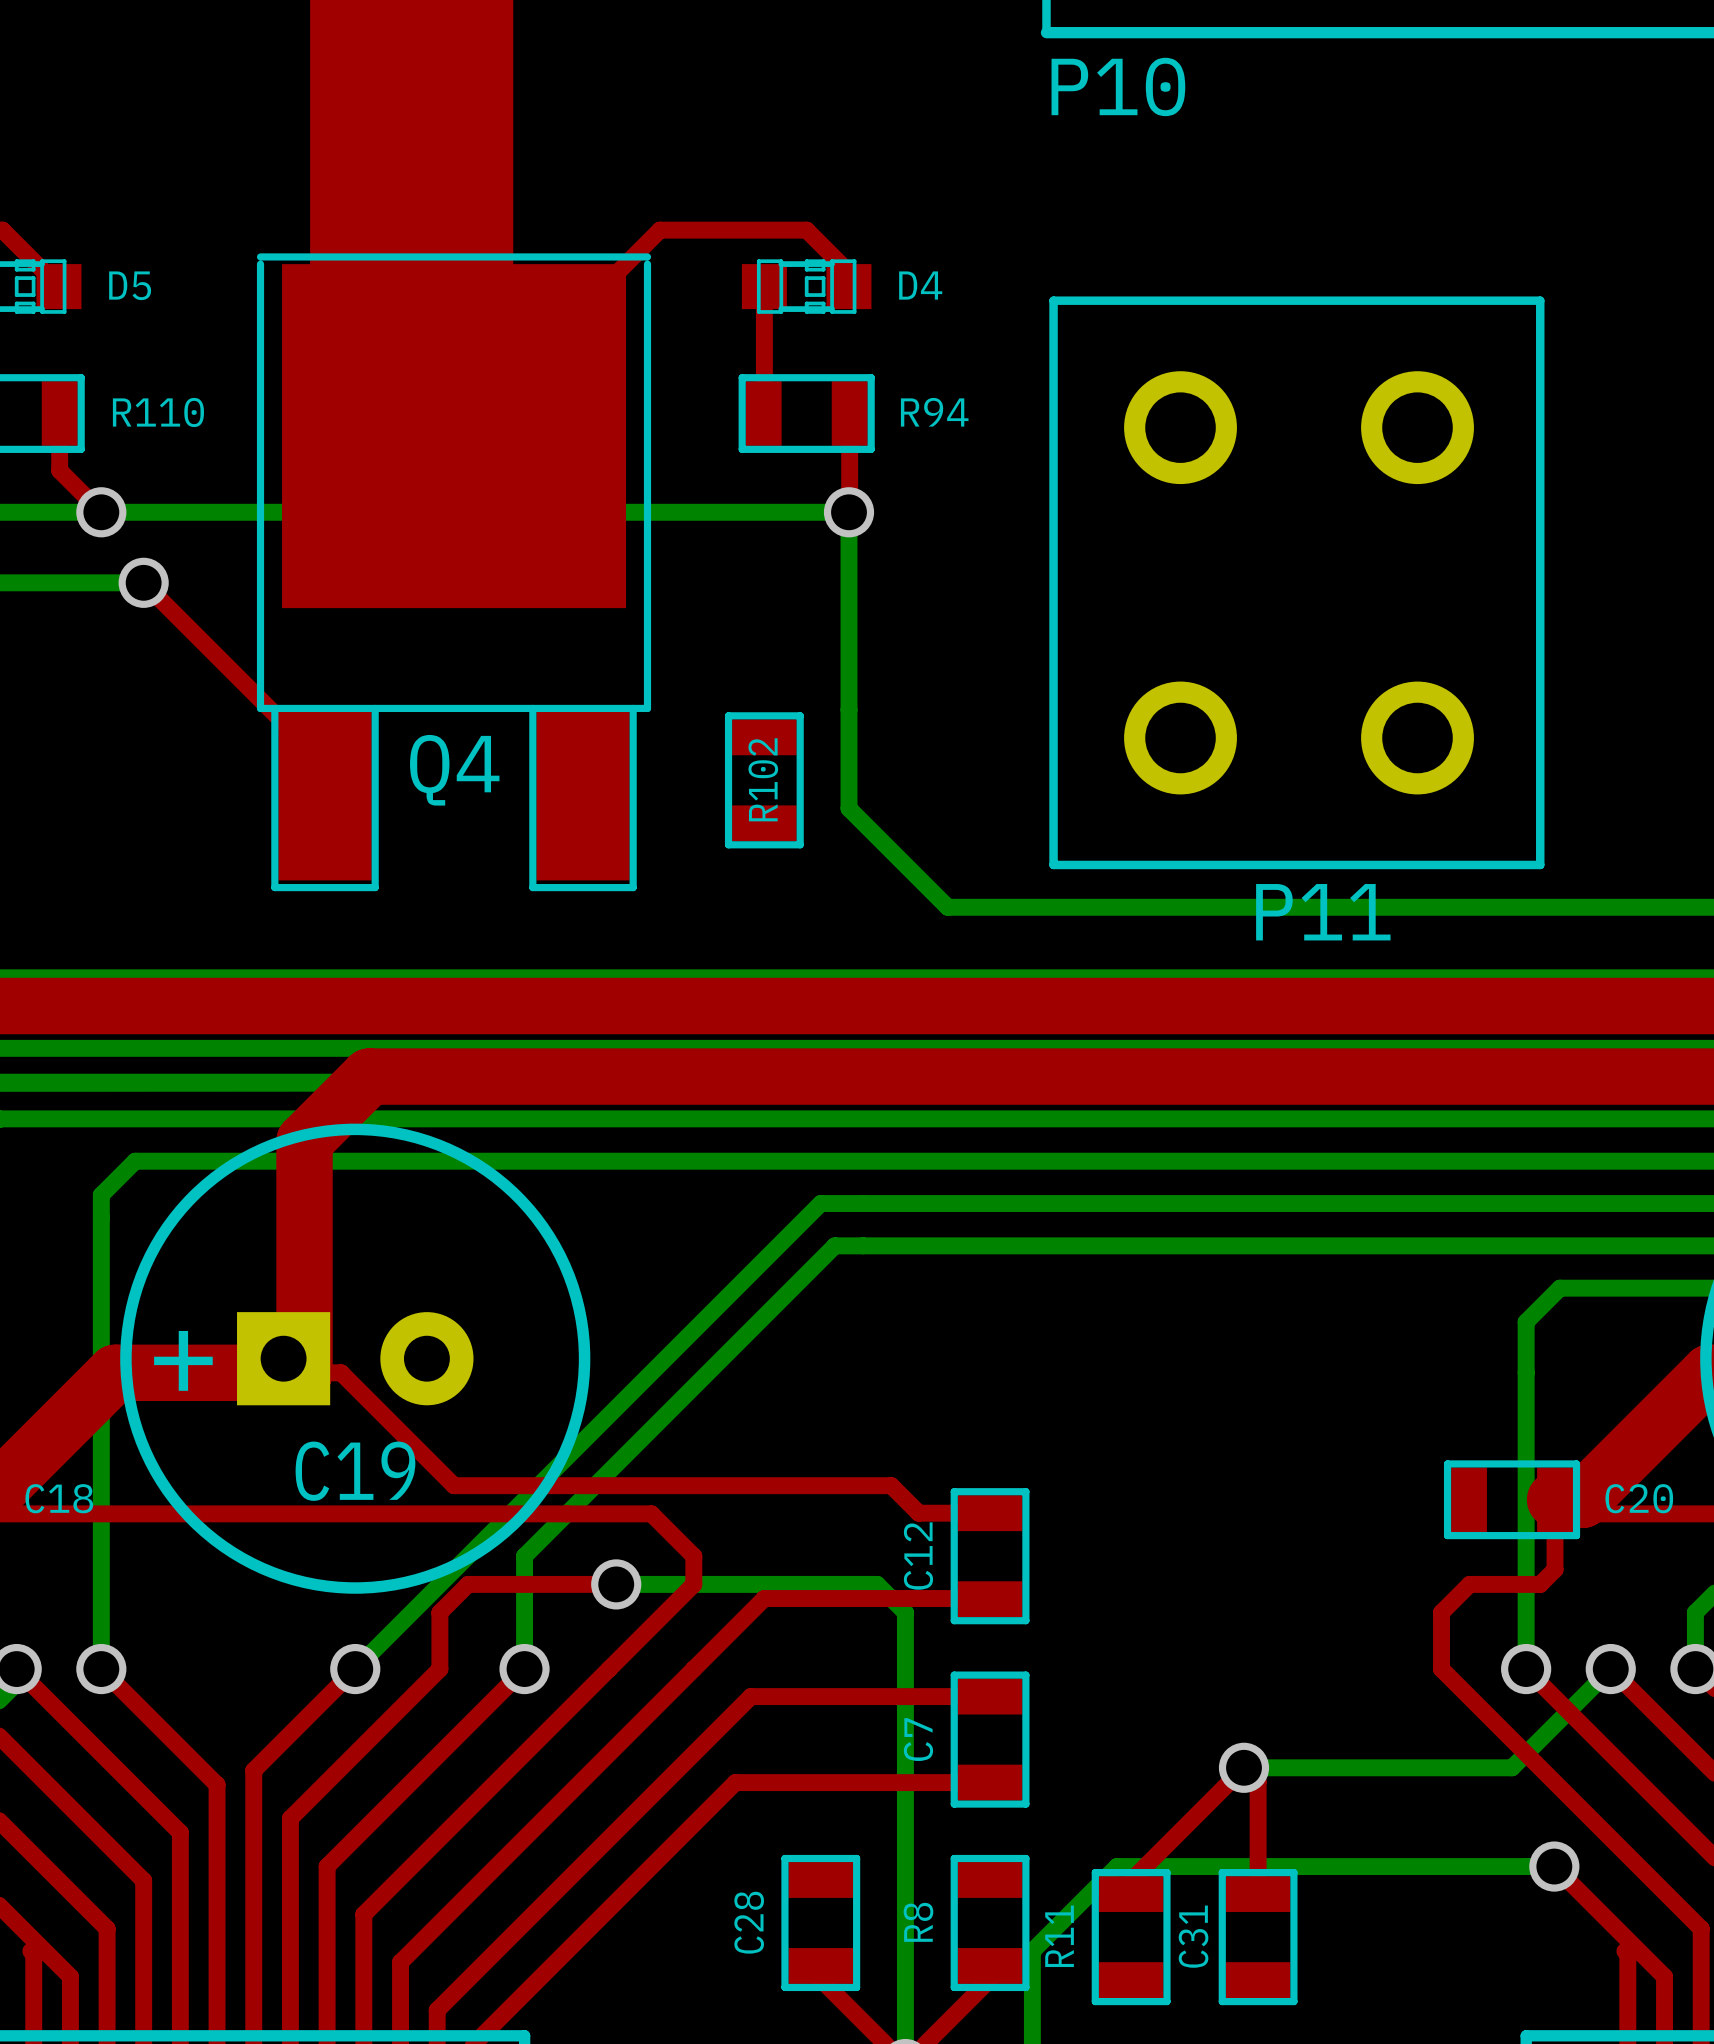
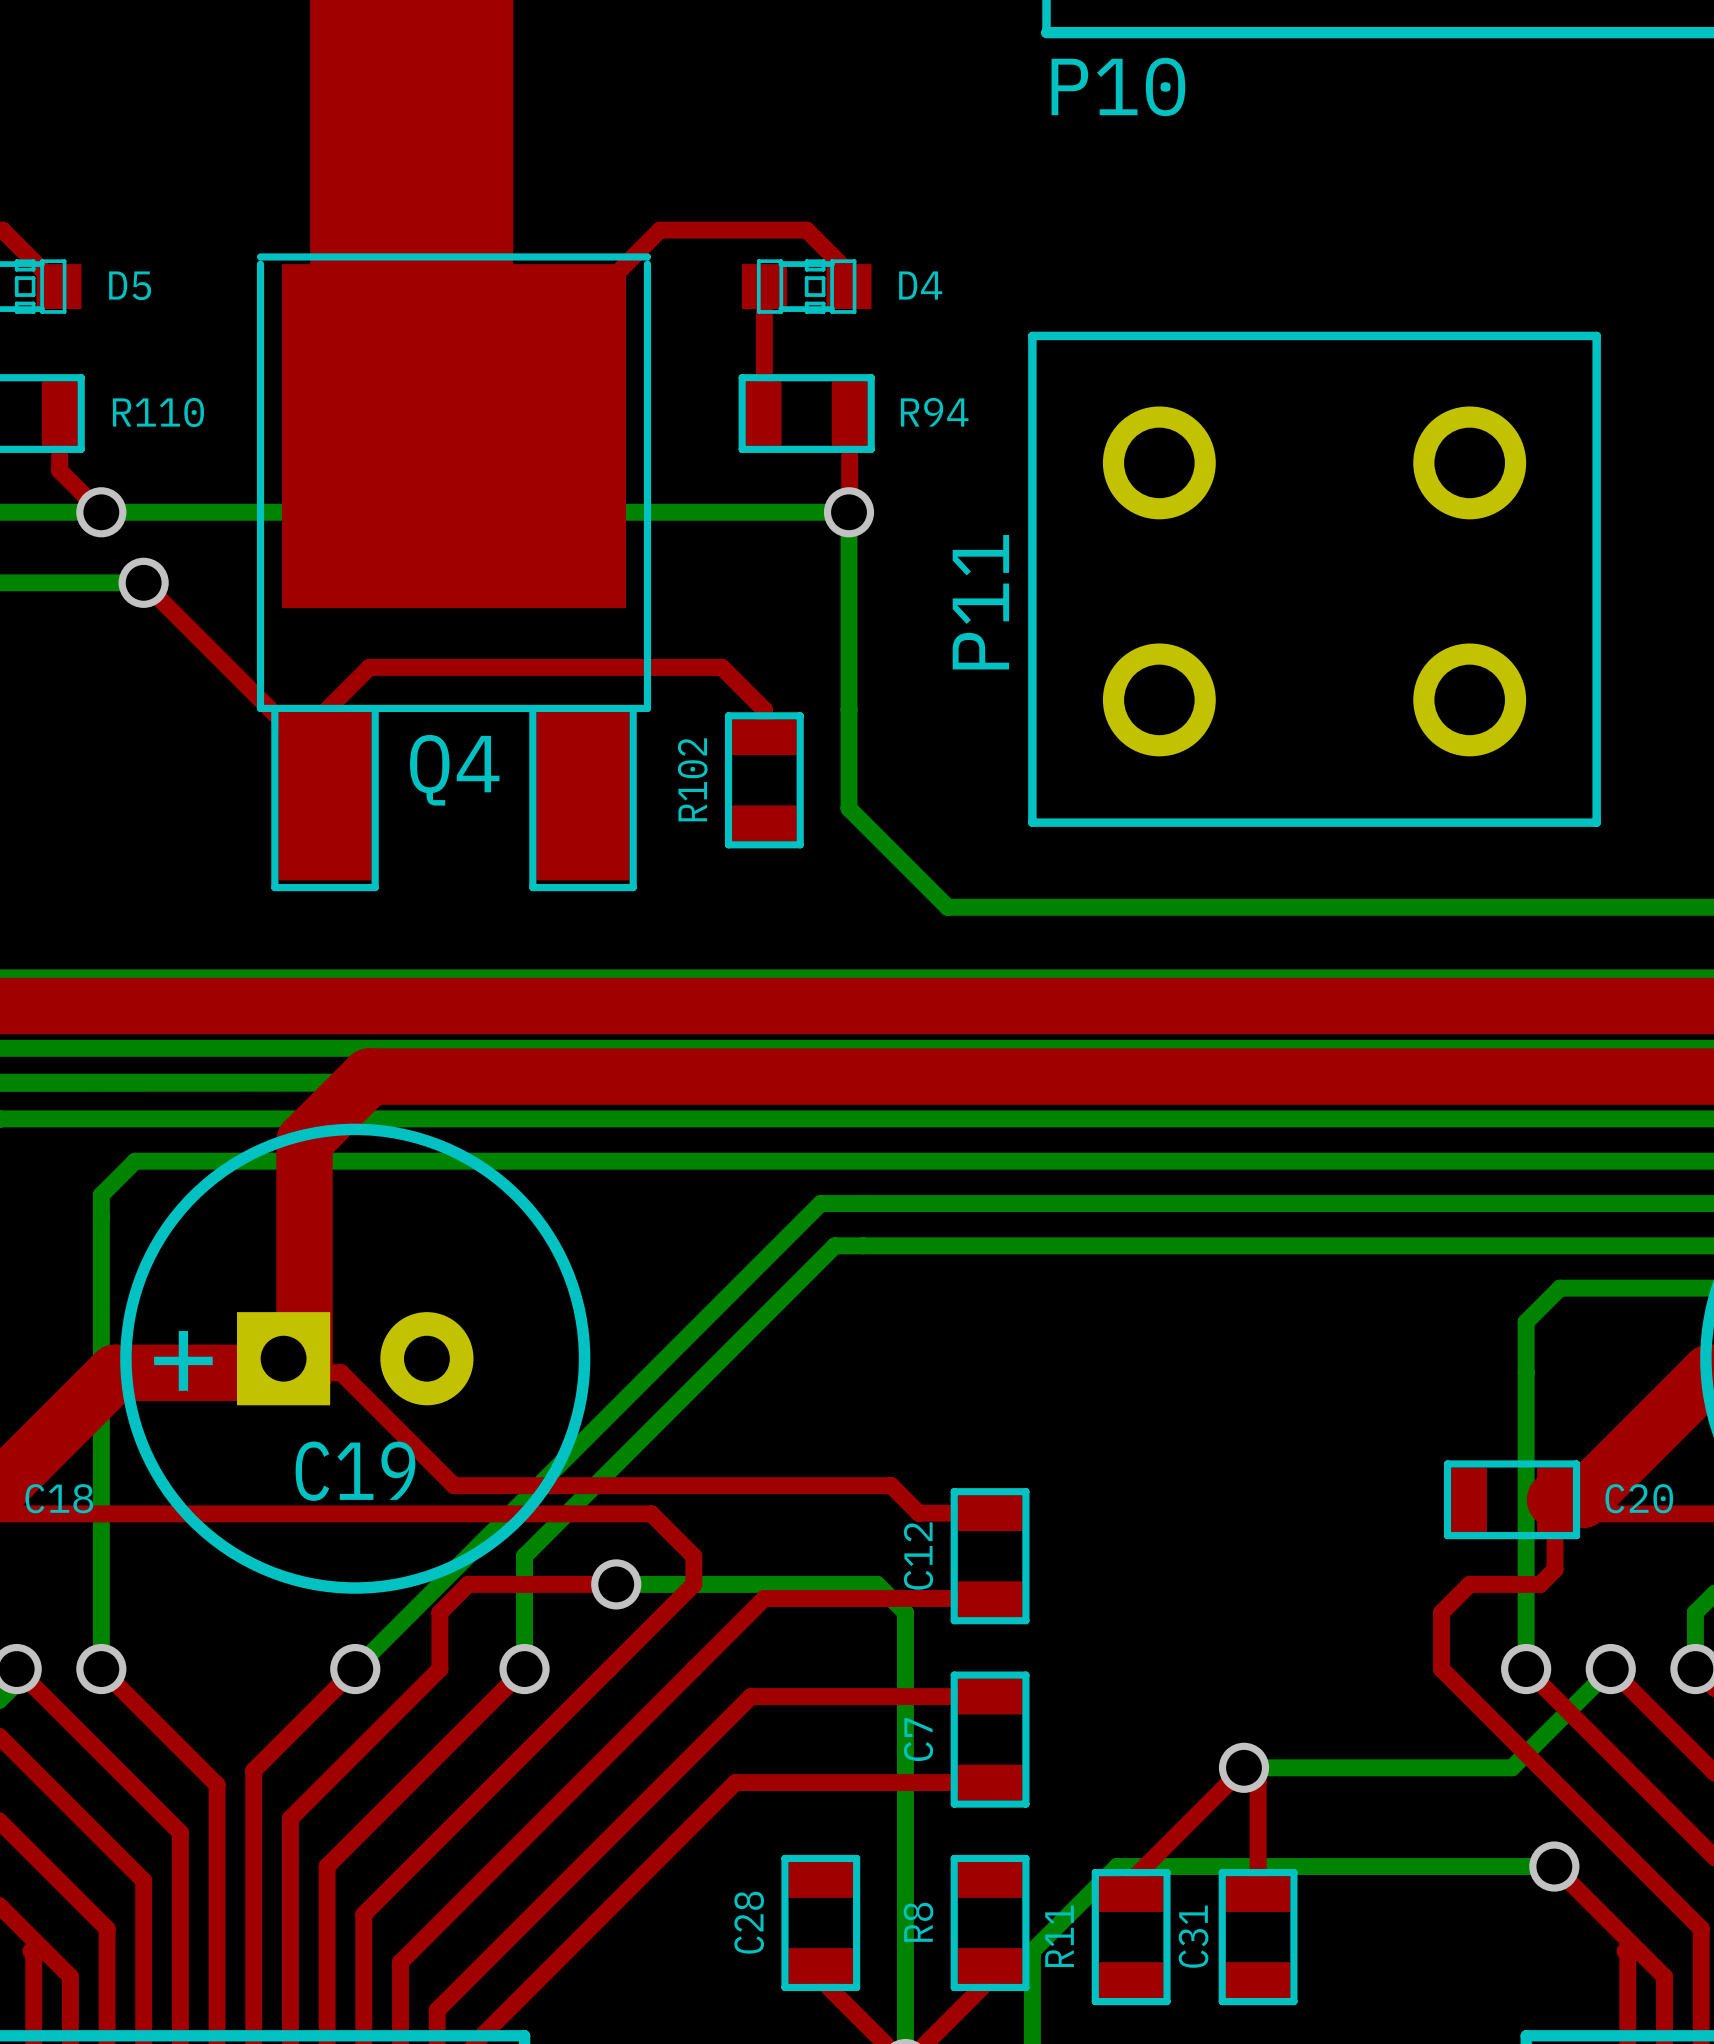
P11 rotation: 0° (1296, 582) -> 90° clockwise (1314, 579)
top track: none -> (764, 737) (764, 709) (722, 667) (369, 667) (325, 711) (325, 764)
R102 name position: R102 (763, 779) -> R102 (692, 779)

